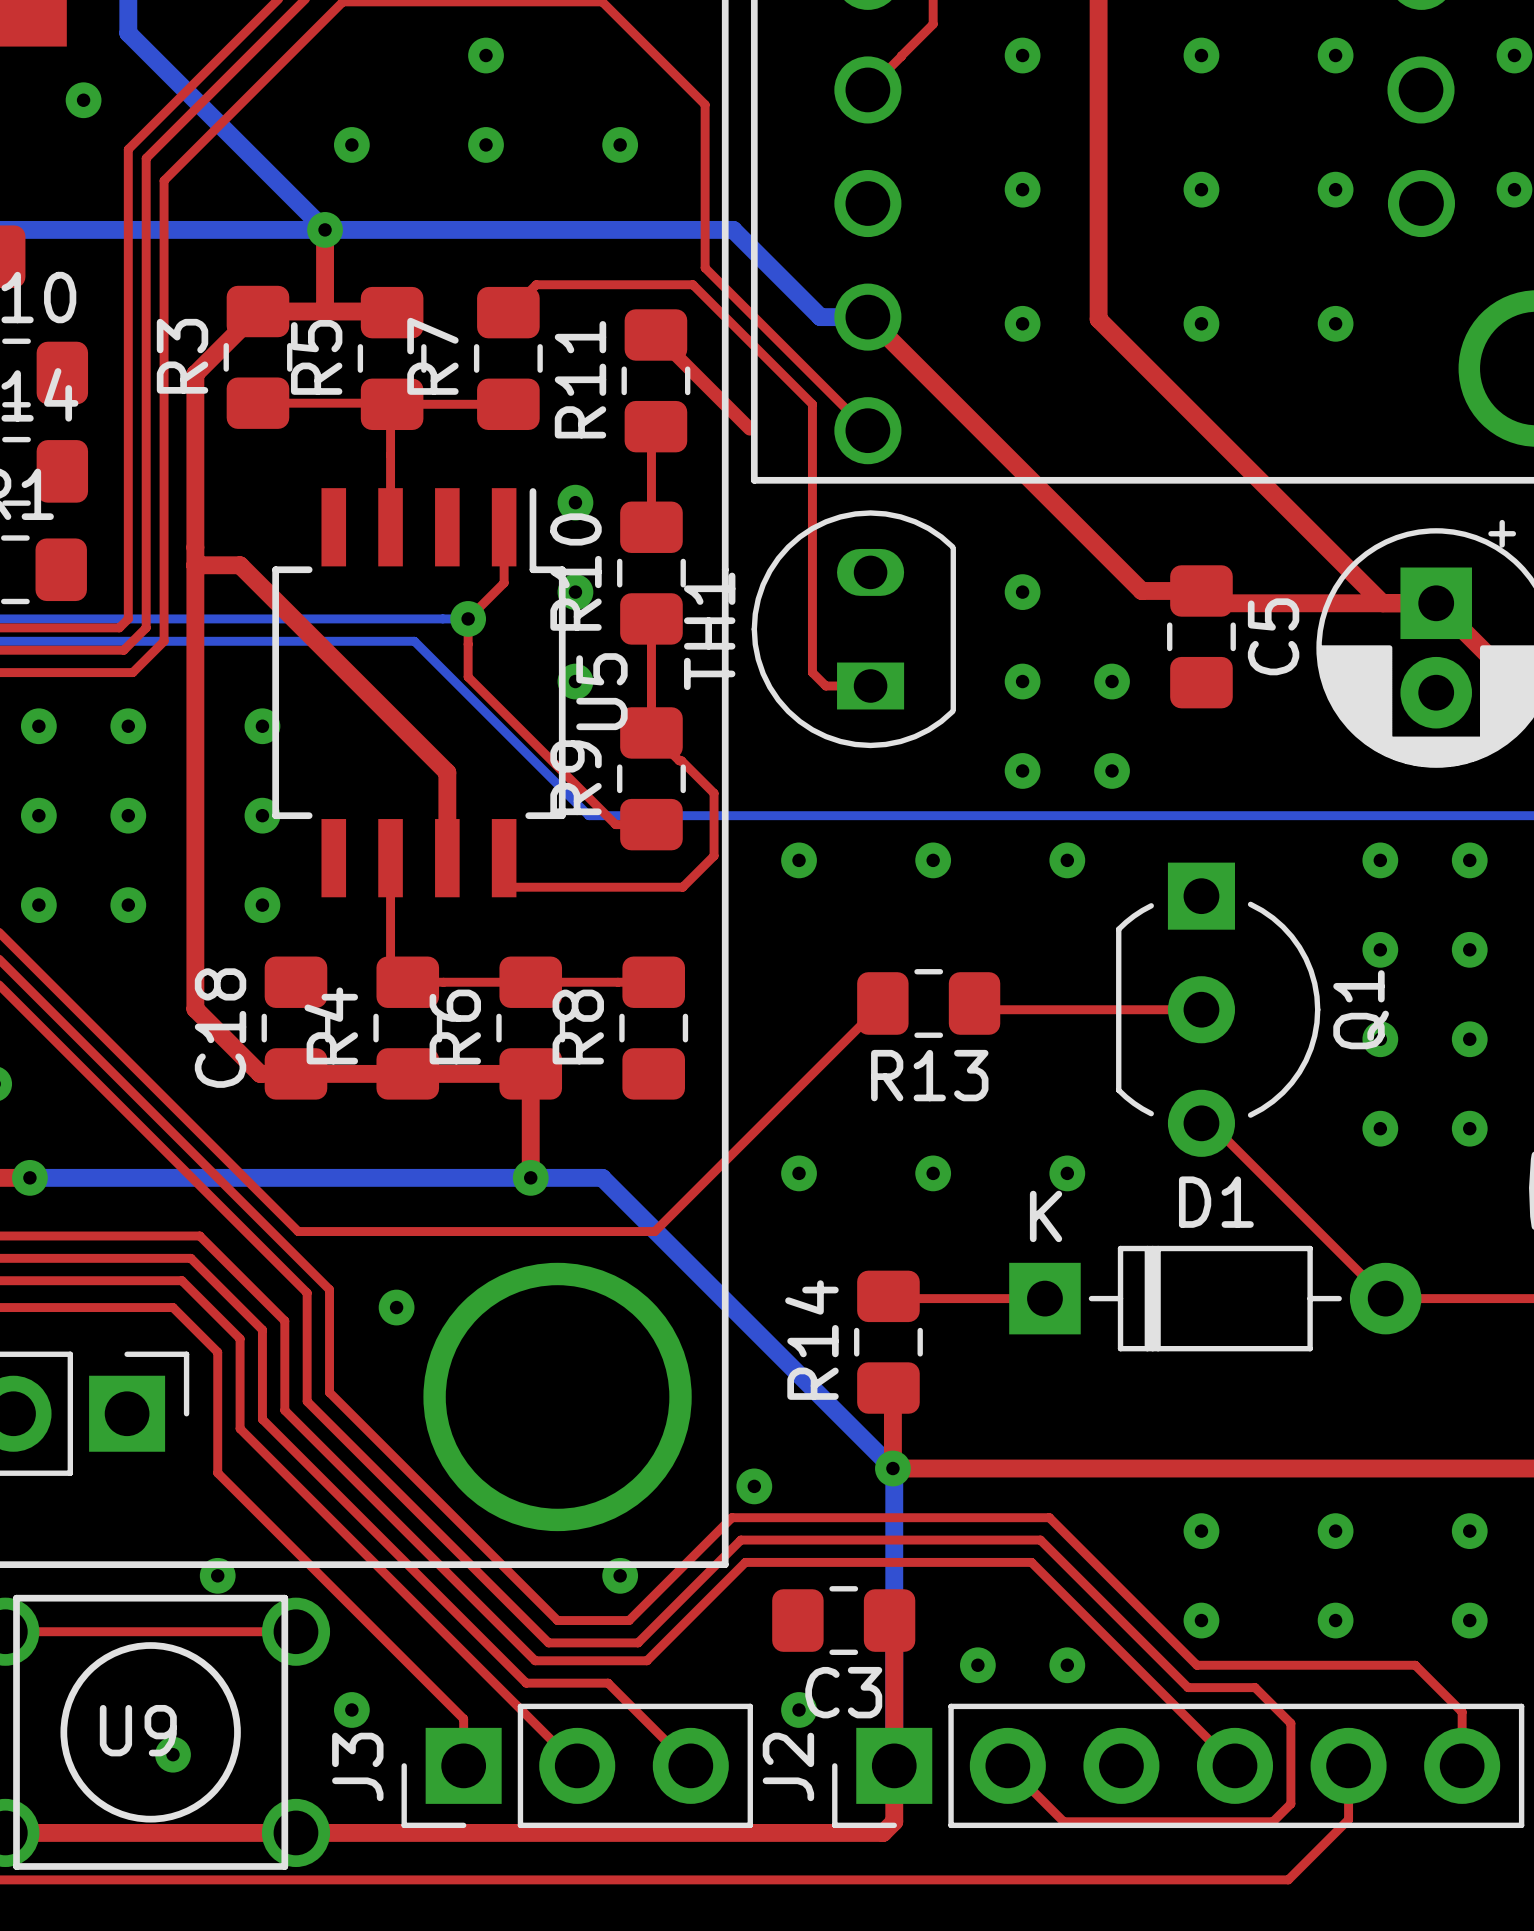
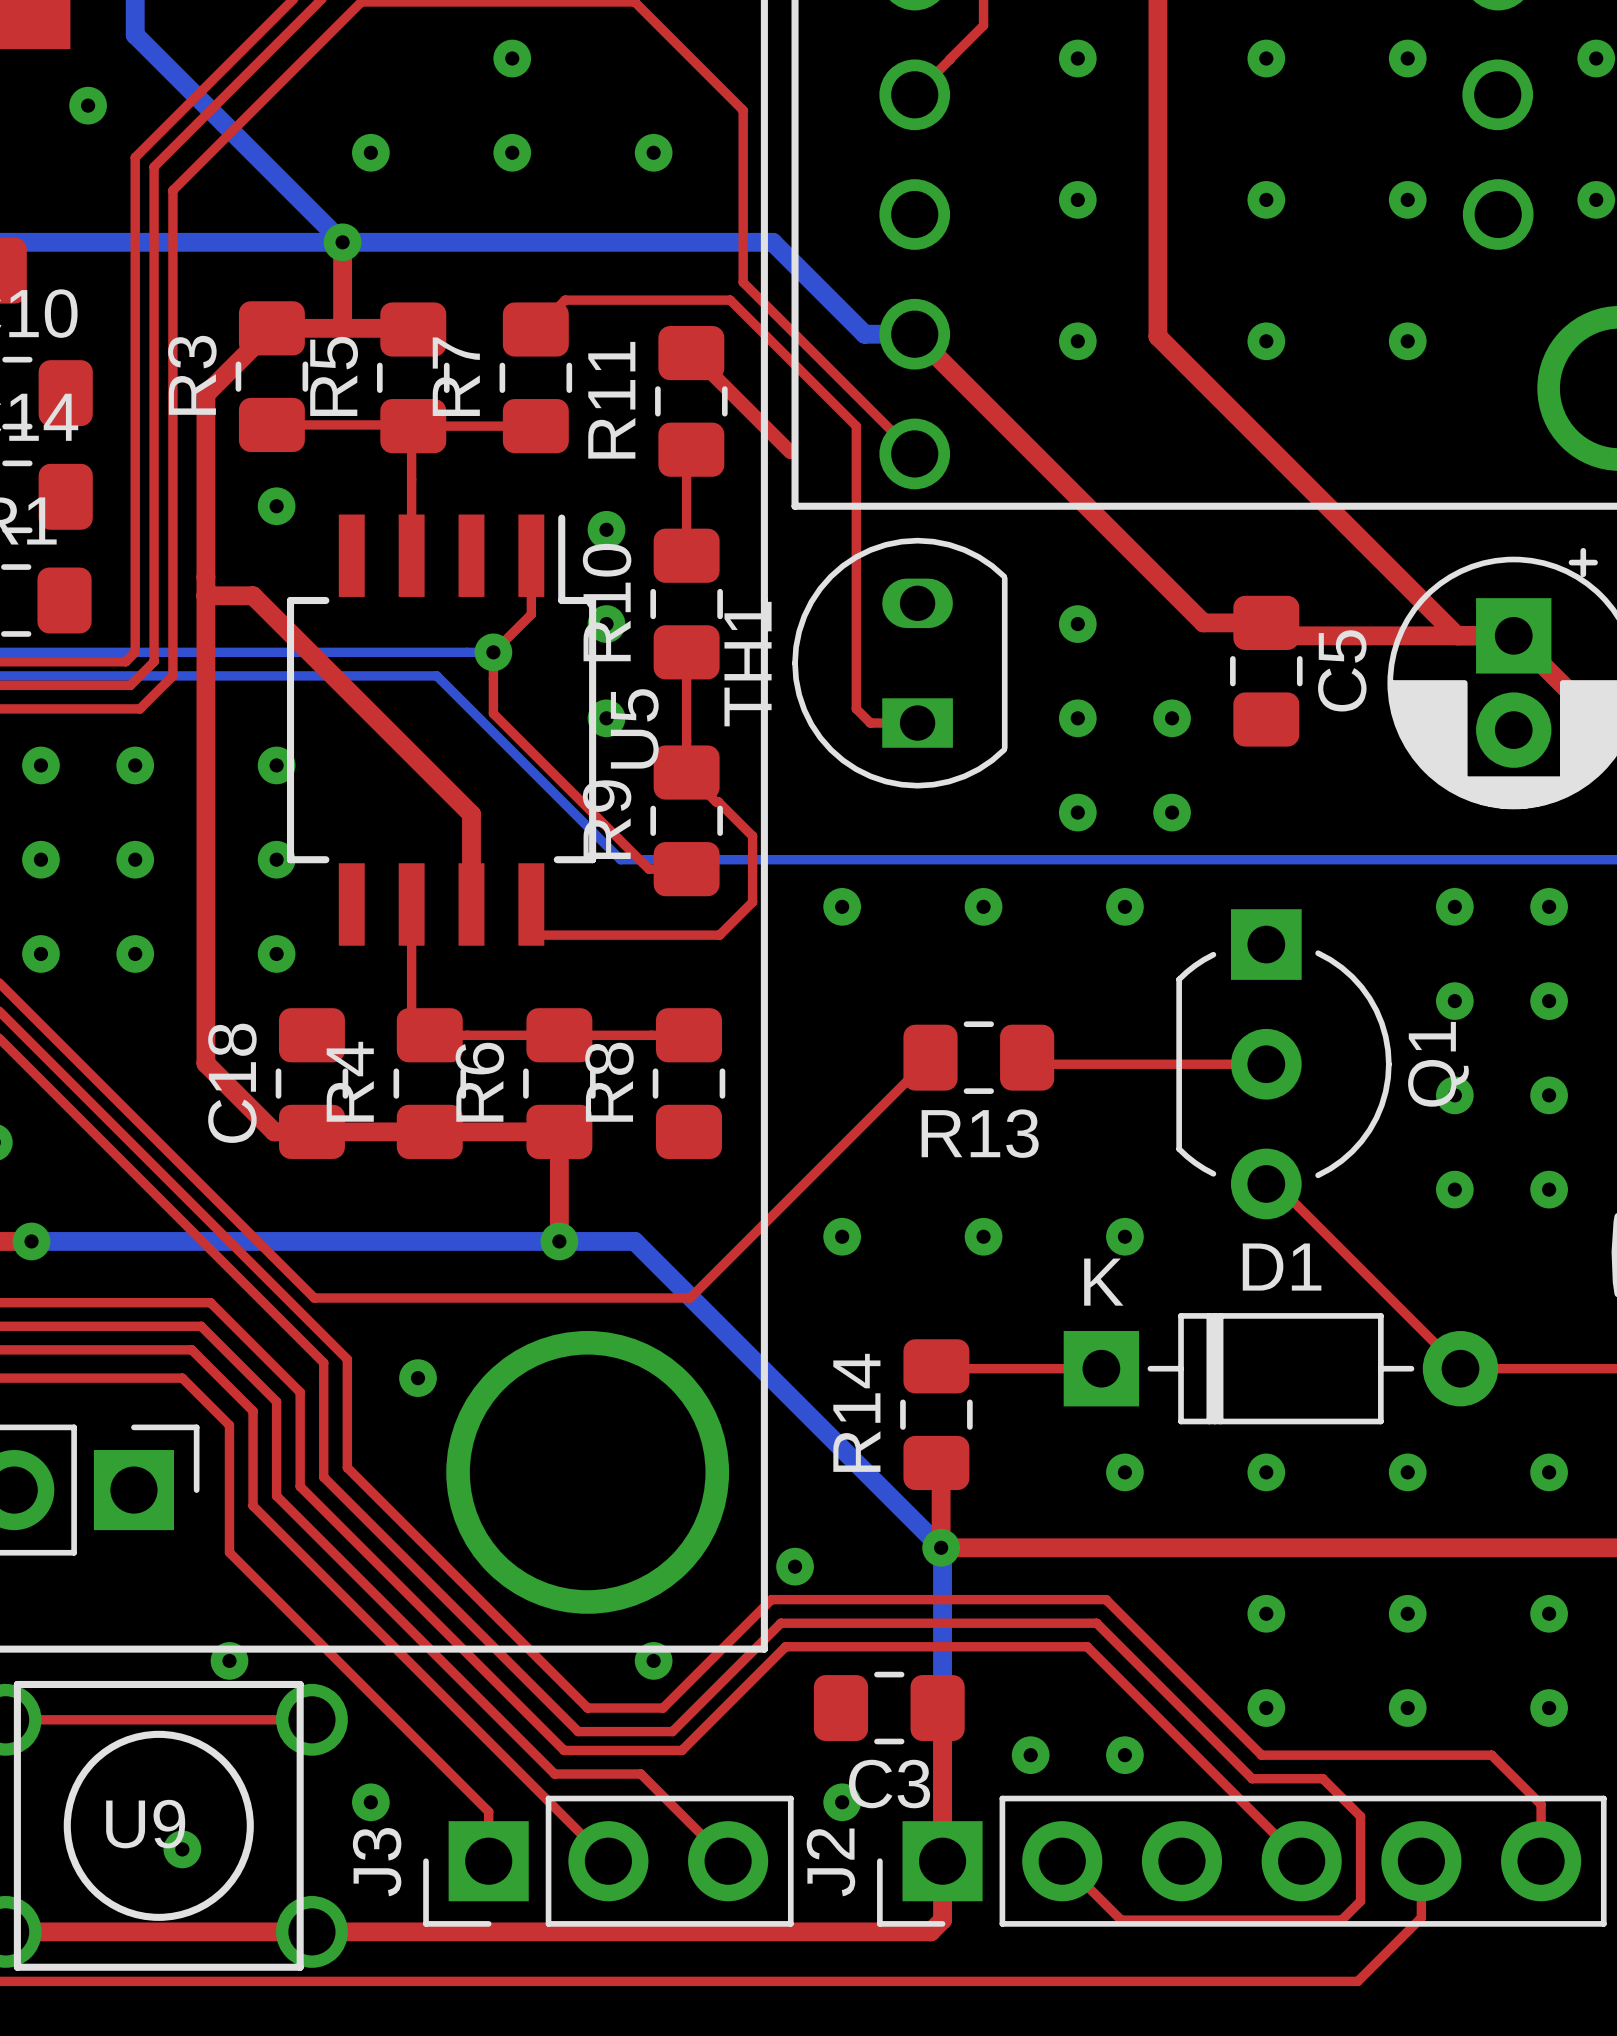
via: none -> (276, 506)
via: none -> (1124, 1472)
via: none -> (1266, 1472)
via: none -> (1407, 1472)
via: none -> (1549, 1472)

